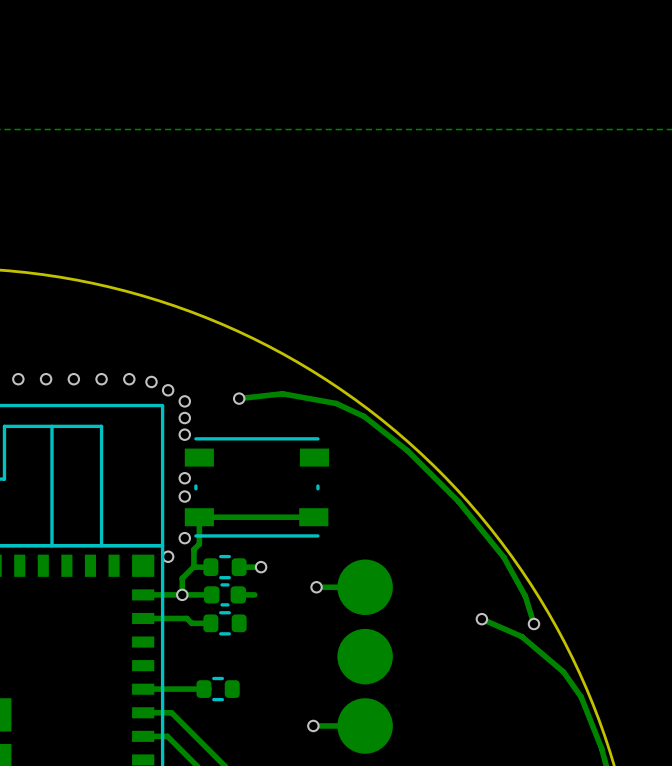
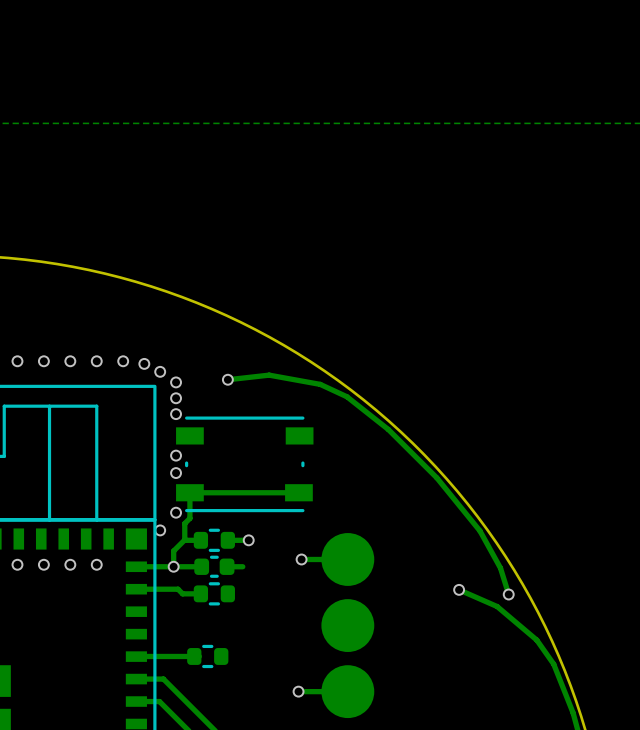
via: none -> (17, 564)
via: none -> (43, 564)
via: none -> (70, 564)
via: none -> (96, 564)

